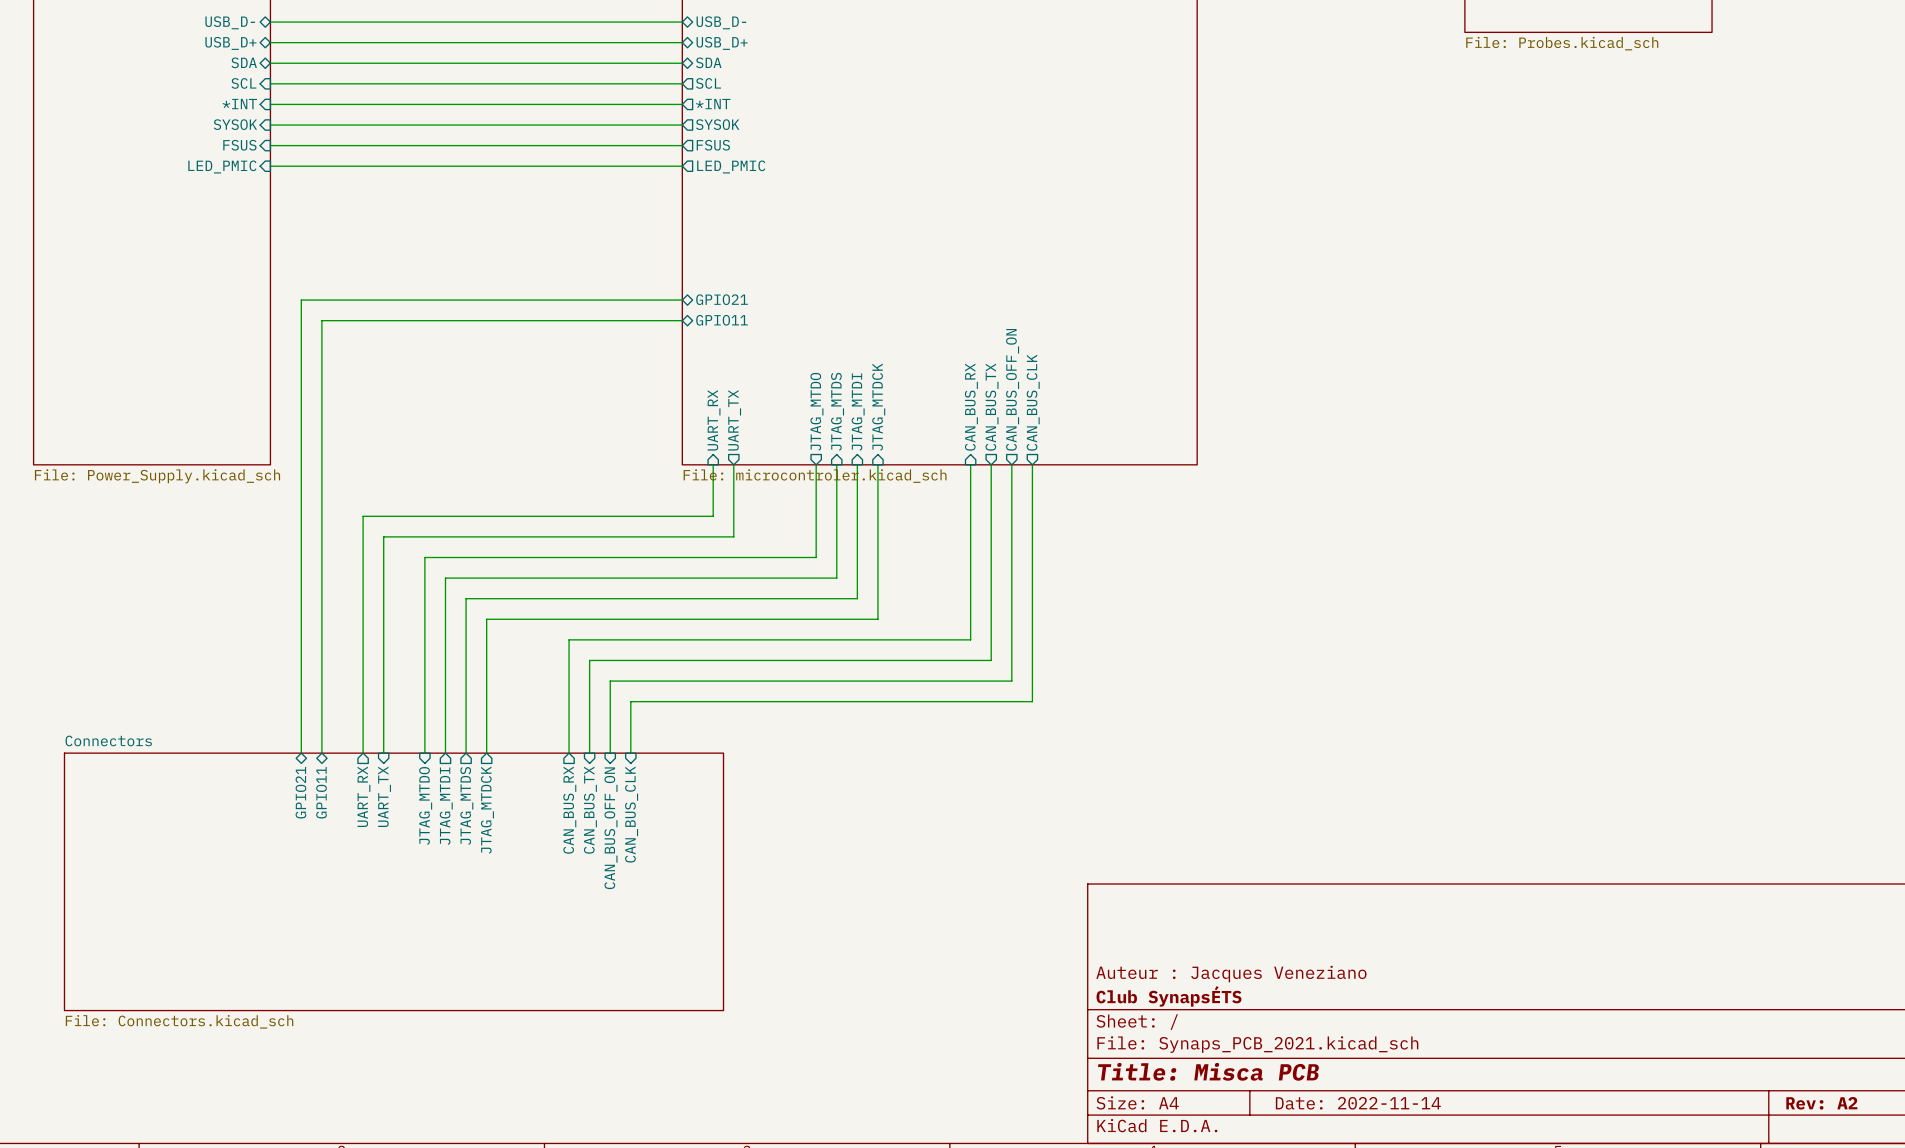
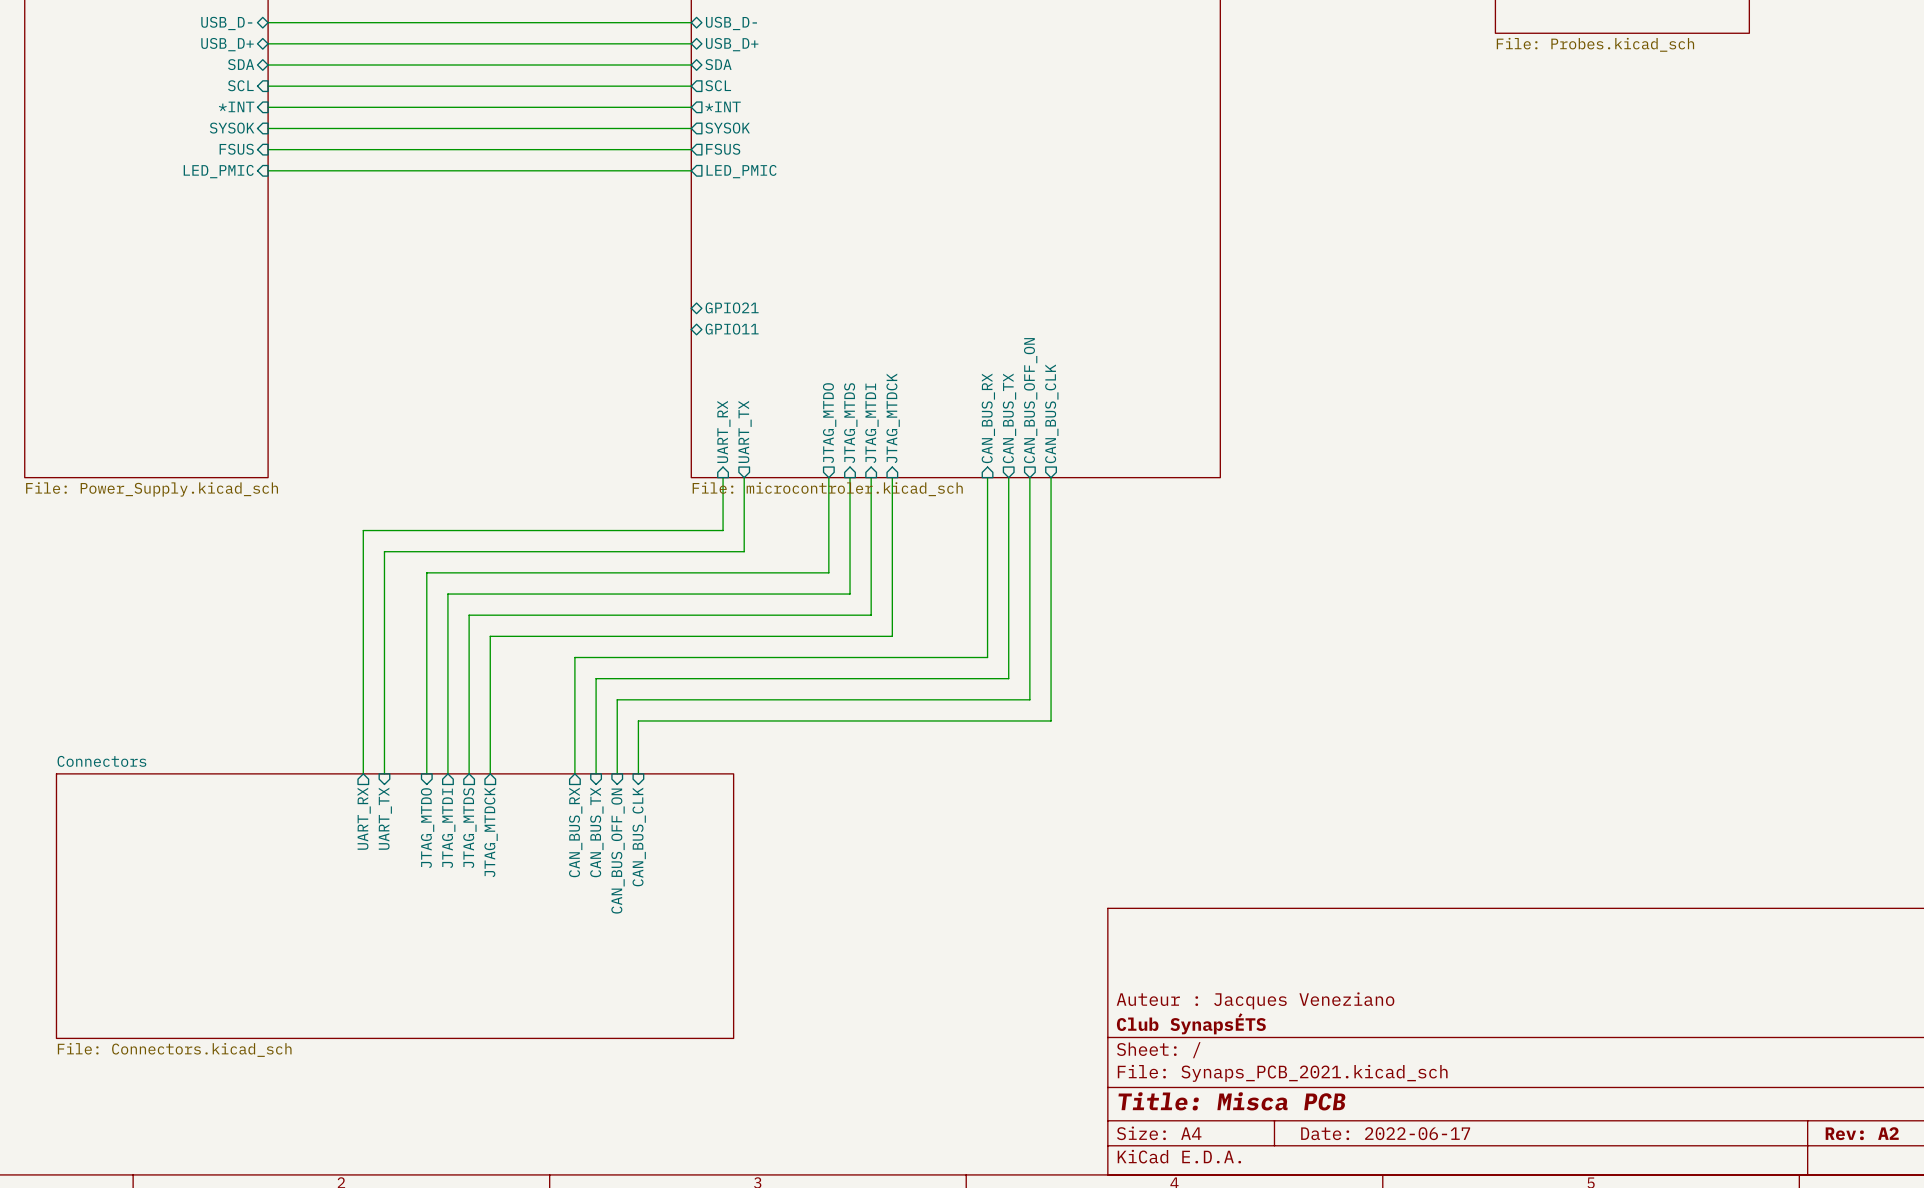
wire: (682, 300) (301, 300) (301, 753) -> none
wire: (682, 320) (321, 320) (321, 753) -> none
sheet pin: GPIO21 (300, 792) -> none
sheet pin: GPIO11 (321, 792) -> none
title block: Date: 2022-11-14 (1358, 1103) -> Date: 2022-06-17 (1385, 1133)

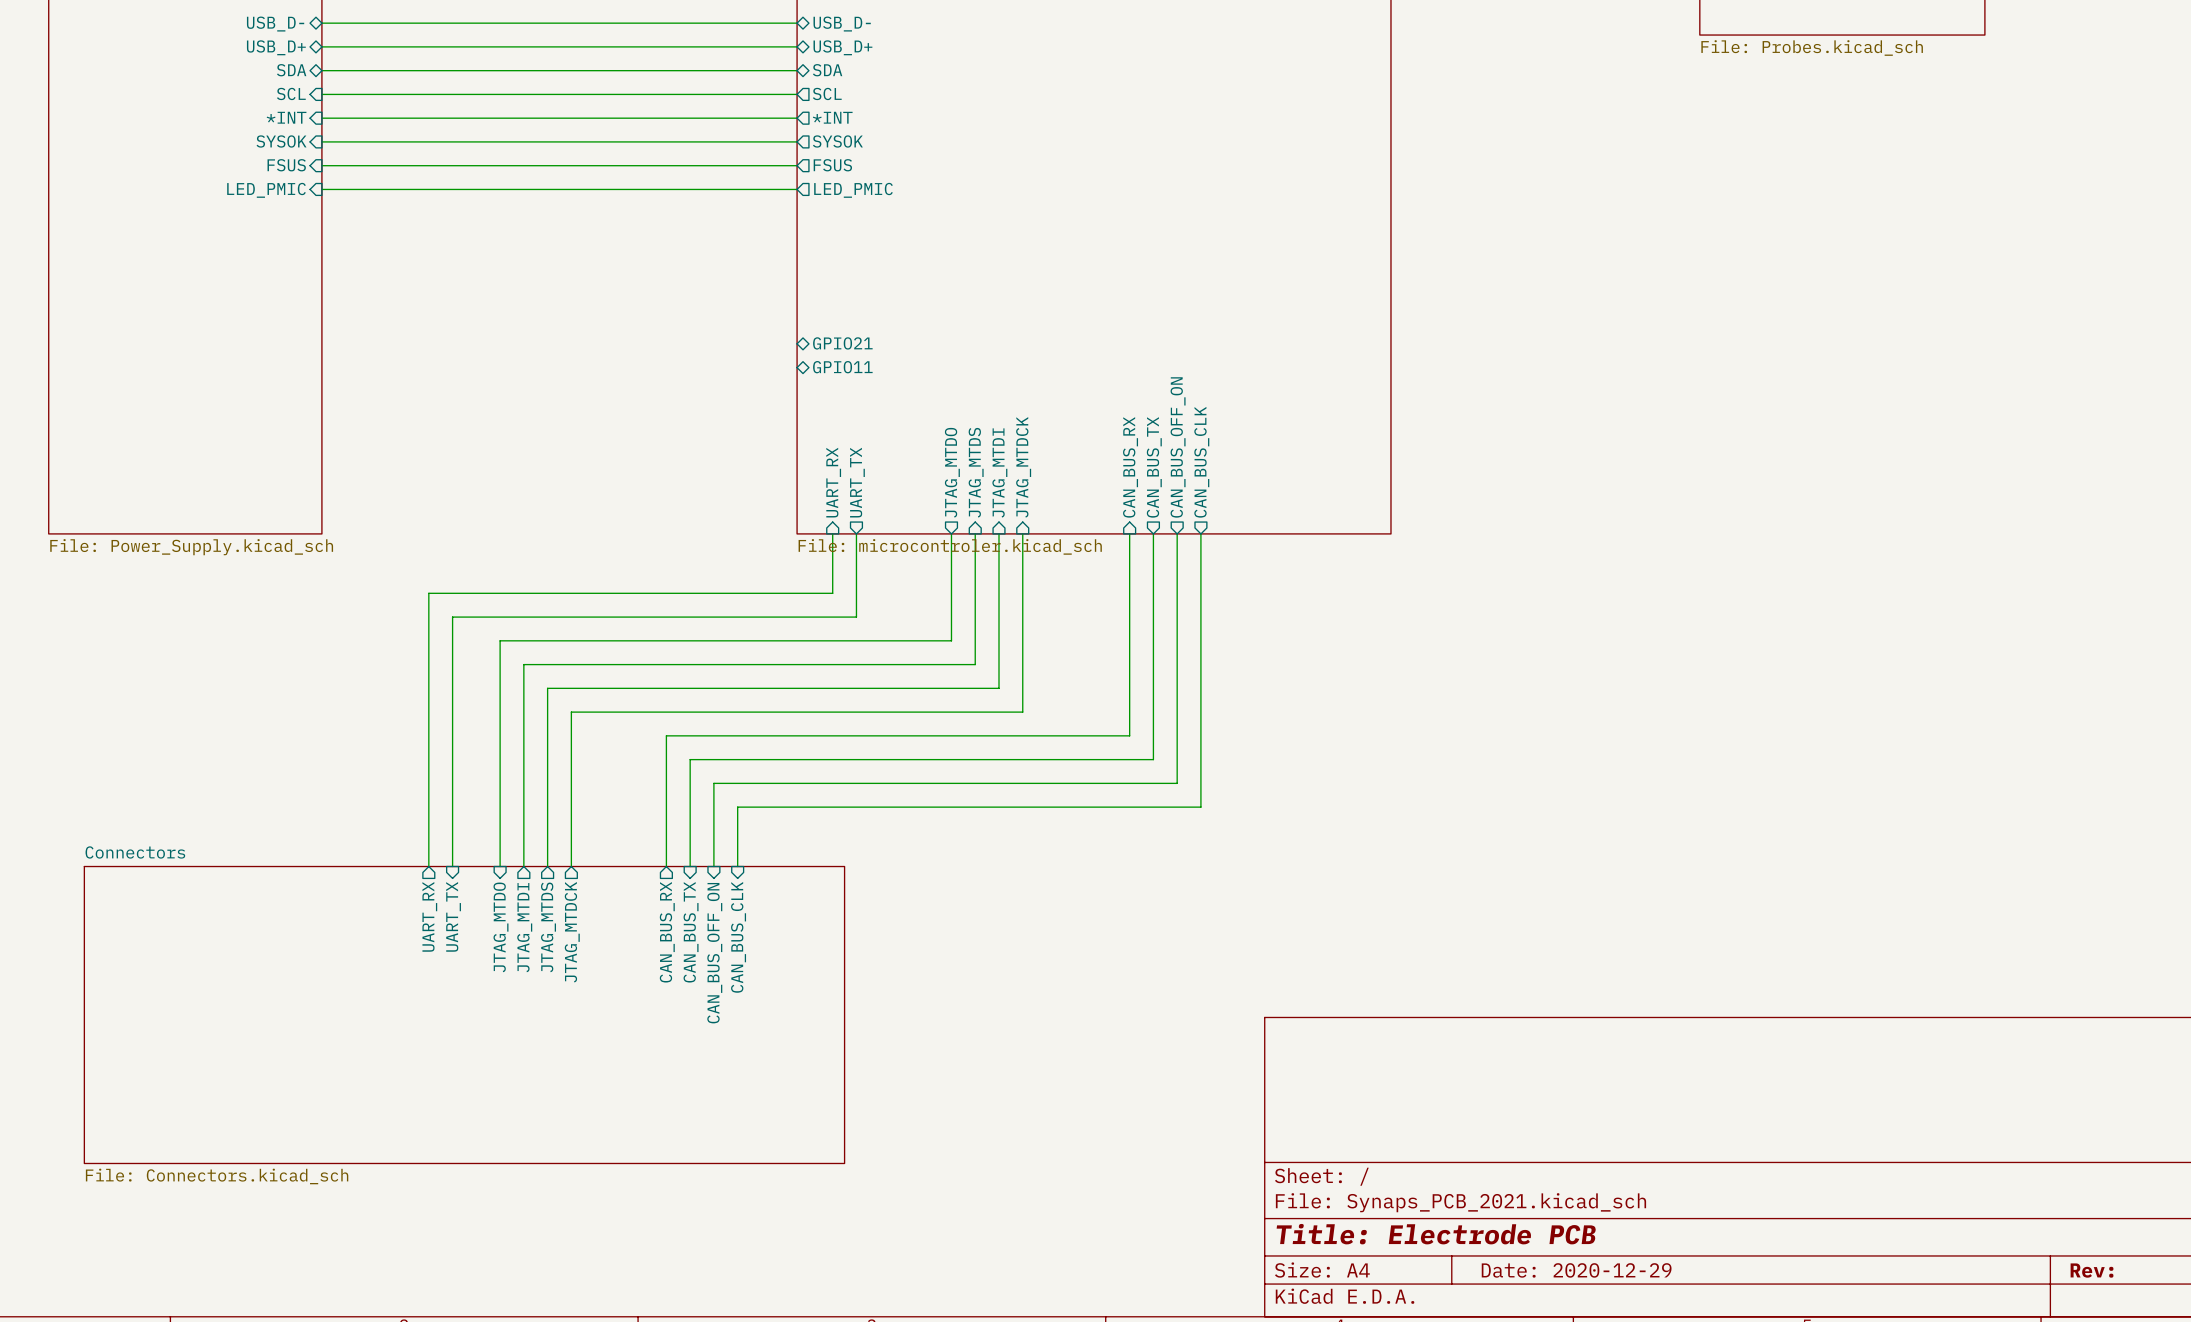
title block: Auteur : Jacques Veneziano (1255, 1000) -> none
title block: Club SynapsÉTS (1191, 1023) -> none
title block: Title: Misca PCB (1232, 1101) -> Title: Electrode PCB (1436, 1234)
title block: Date: 2022-06-17 (1385, 1133) -> Date: 2020-12-29 (1576, 1270)
title block: Rev: A2 (1862, 1133) -> Rev: (2092, 1270)

